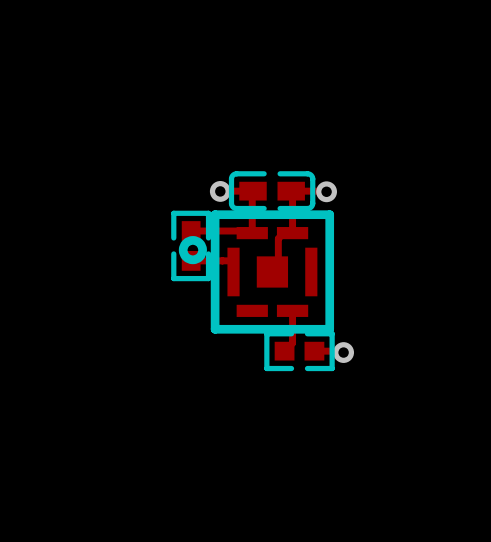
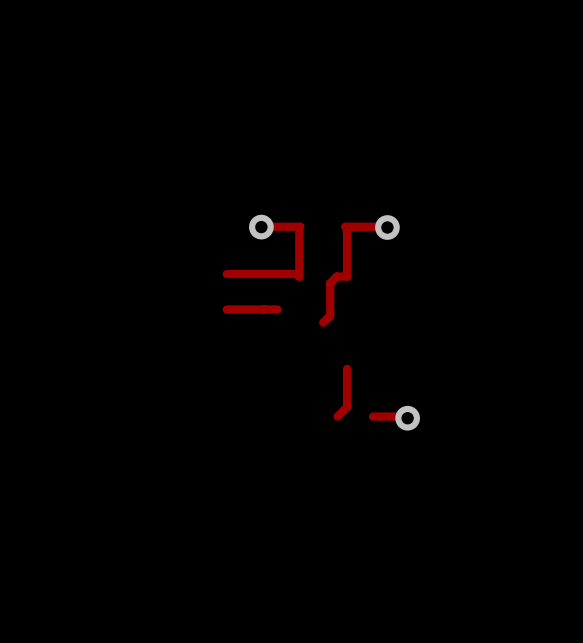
part: (272, 191) -> none
part: (191, 245) -> none
part: (256, 271) -> none
part: (299, 351) -> none

